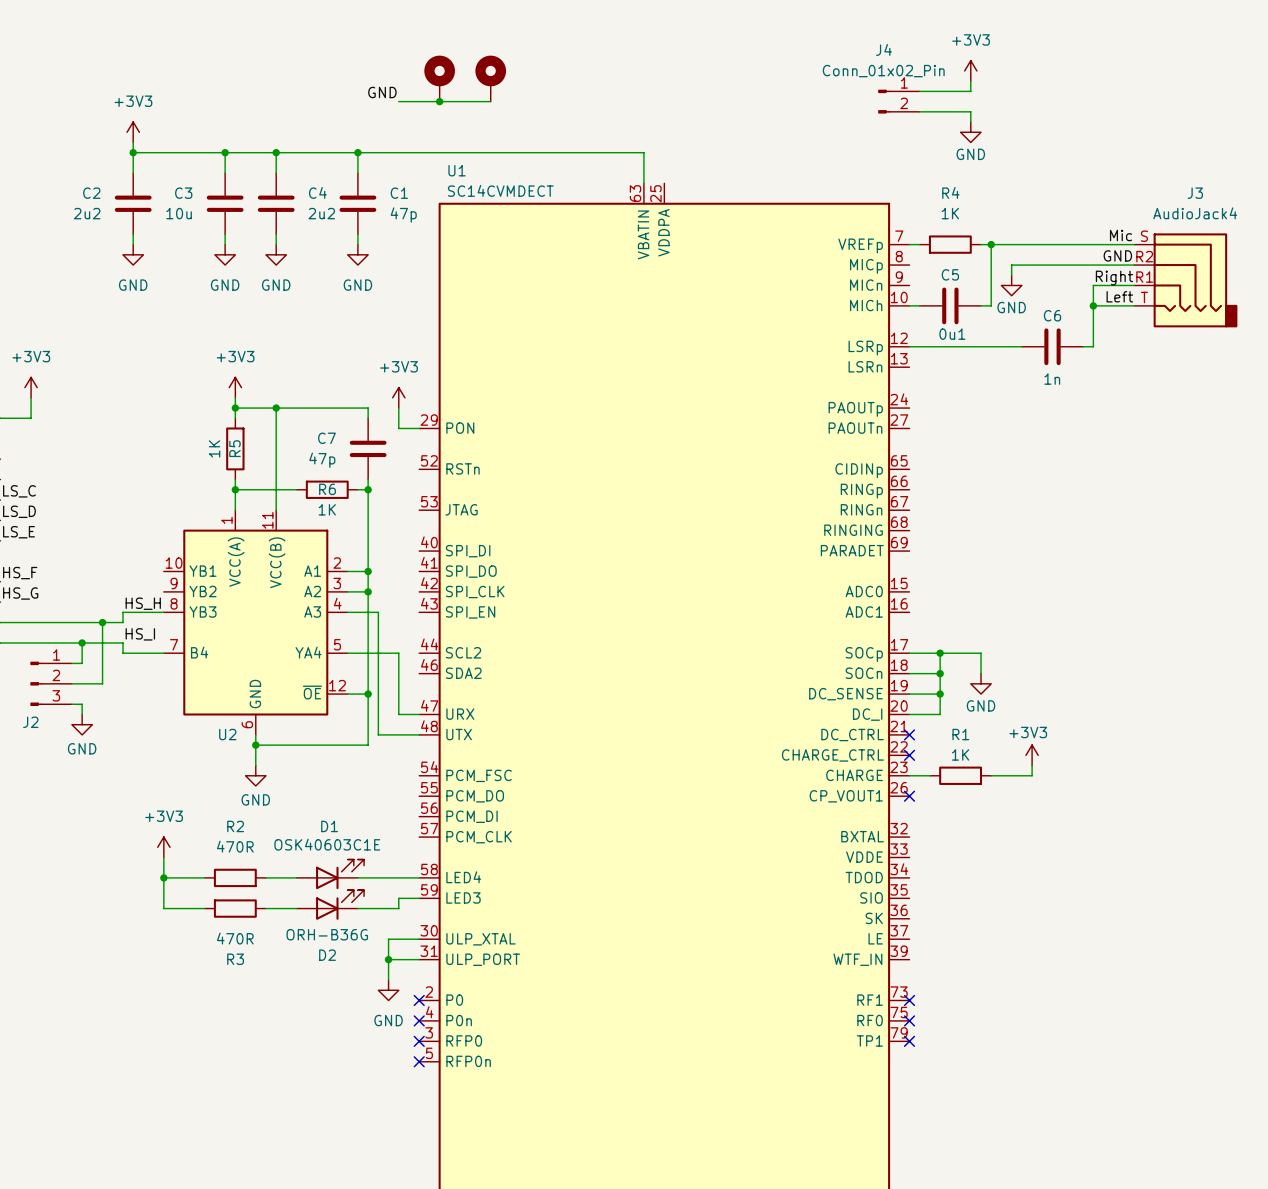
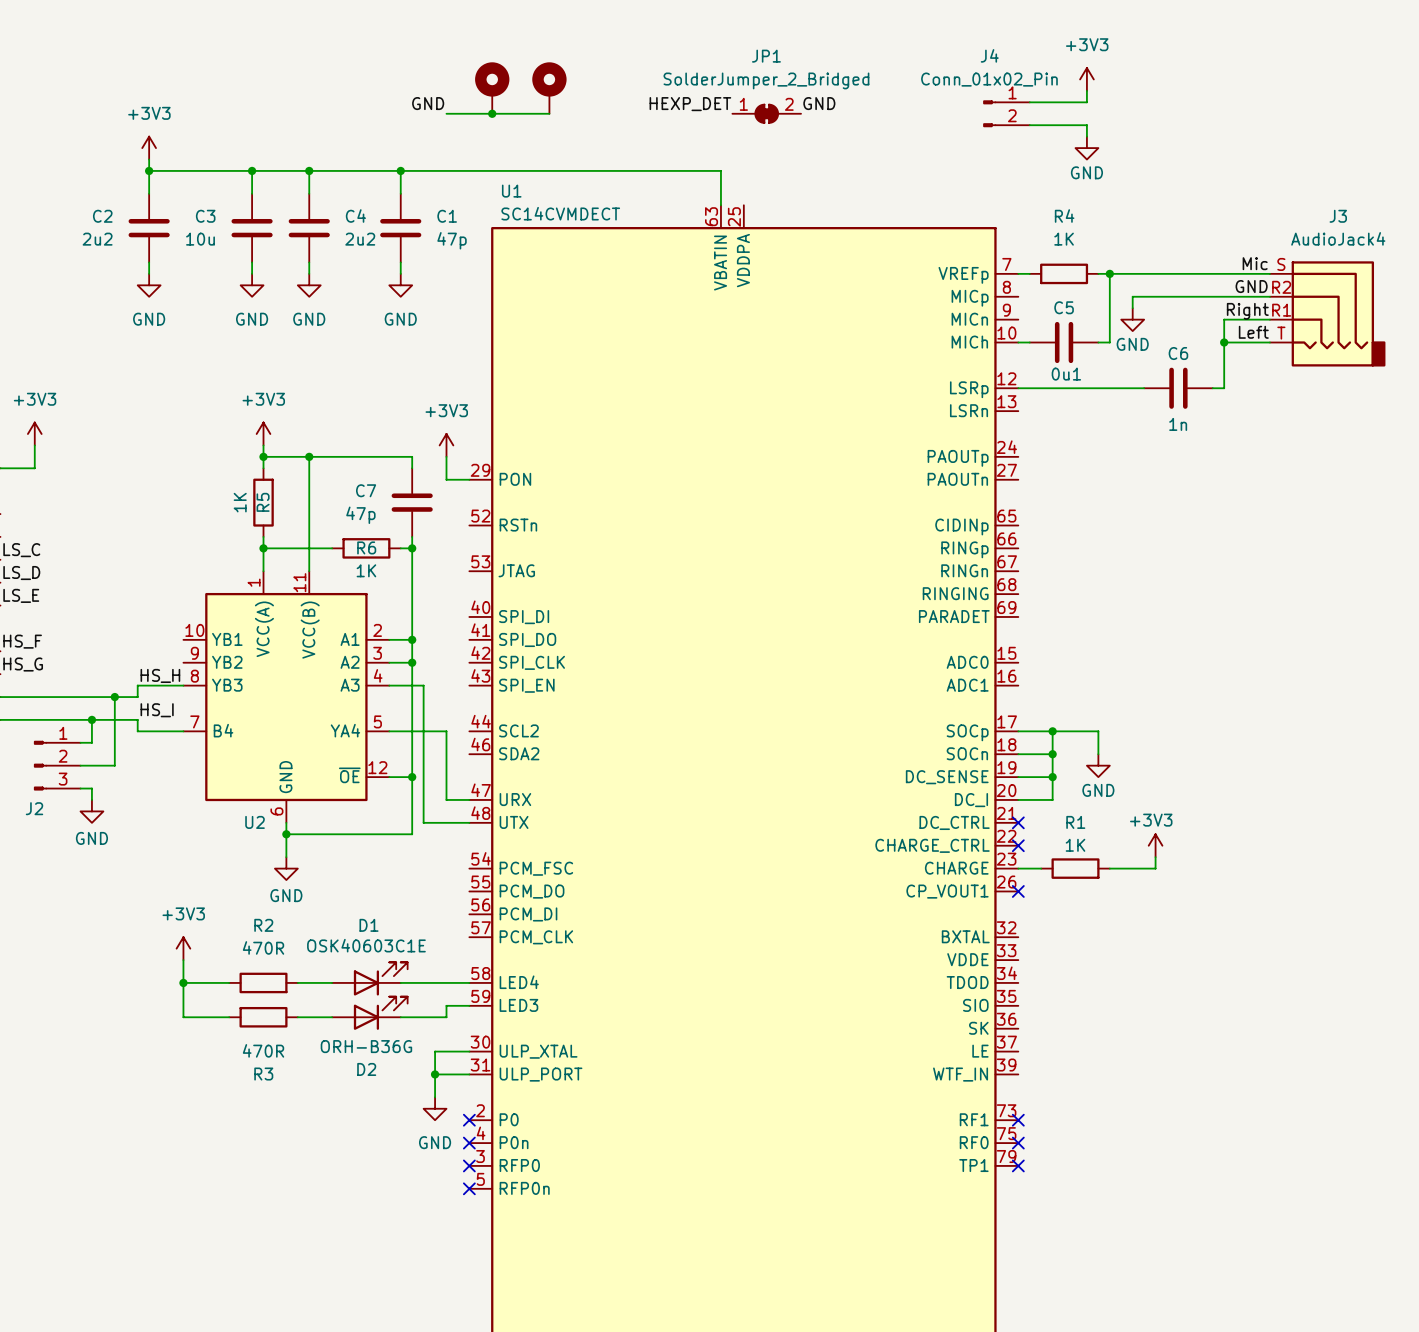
label: none -> HEXP_DET (690, 104)
label: none -> GND (819, 103)
JP1: none -> SolderJumper_2_Bridged (766, 113)

